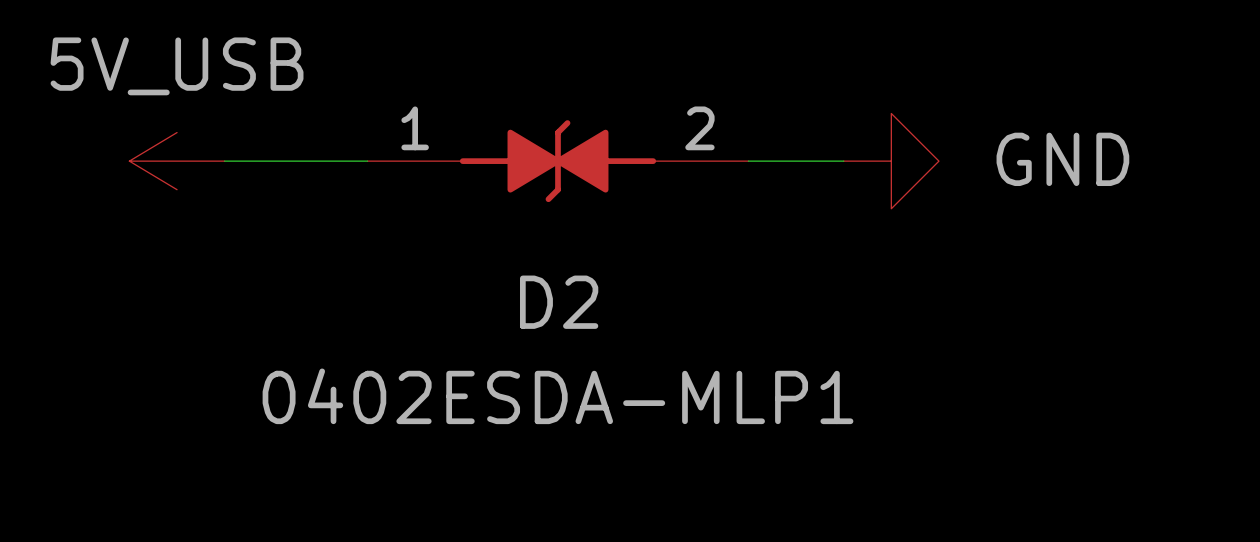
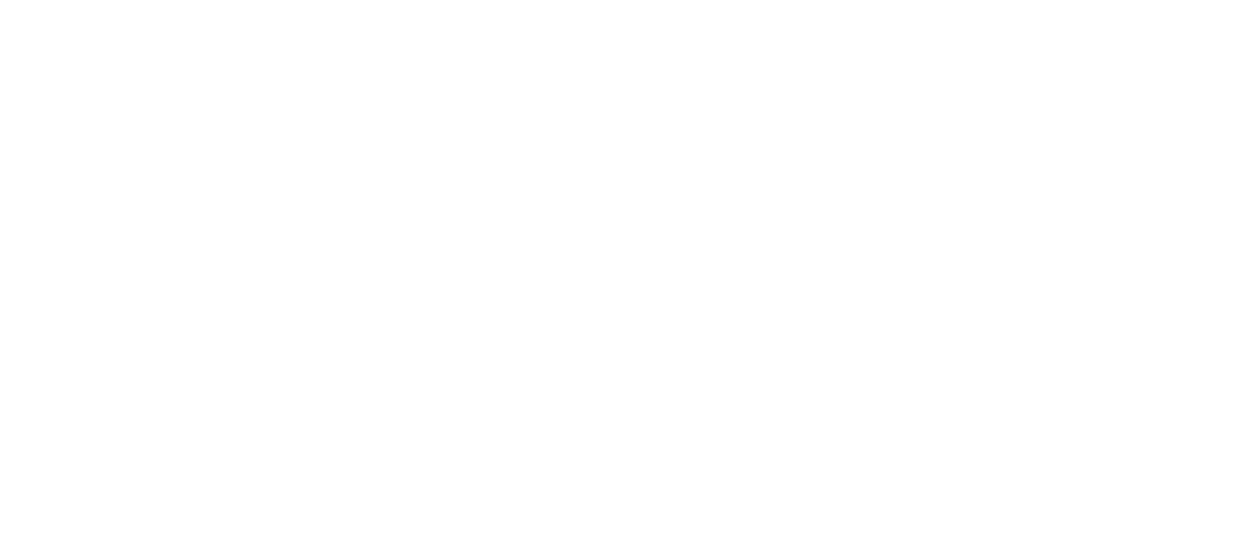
power symbol: 5V_USB (177, 161) -> none
wire: (224, 161) (367, 161) -> none
D2: 0402ESDA-MLP1 (557, 161) -> none
wire: (748, 161) (843, 161) -> none
power symbol: GND (891, 161) -> none

